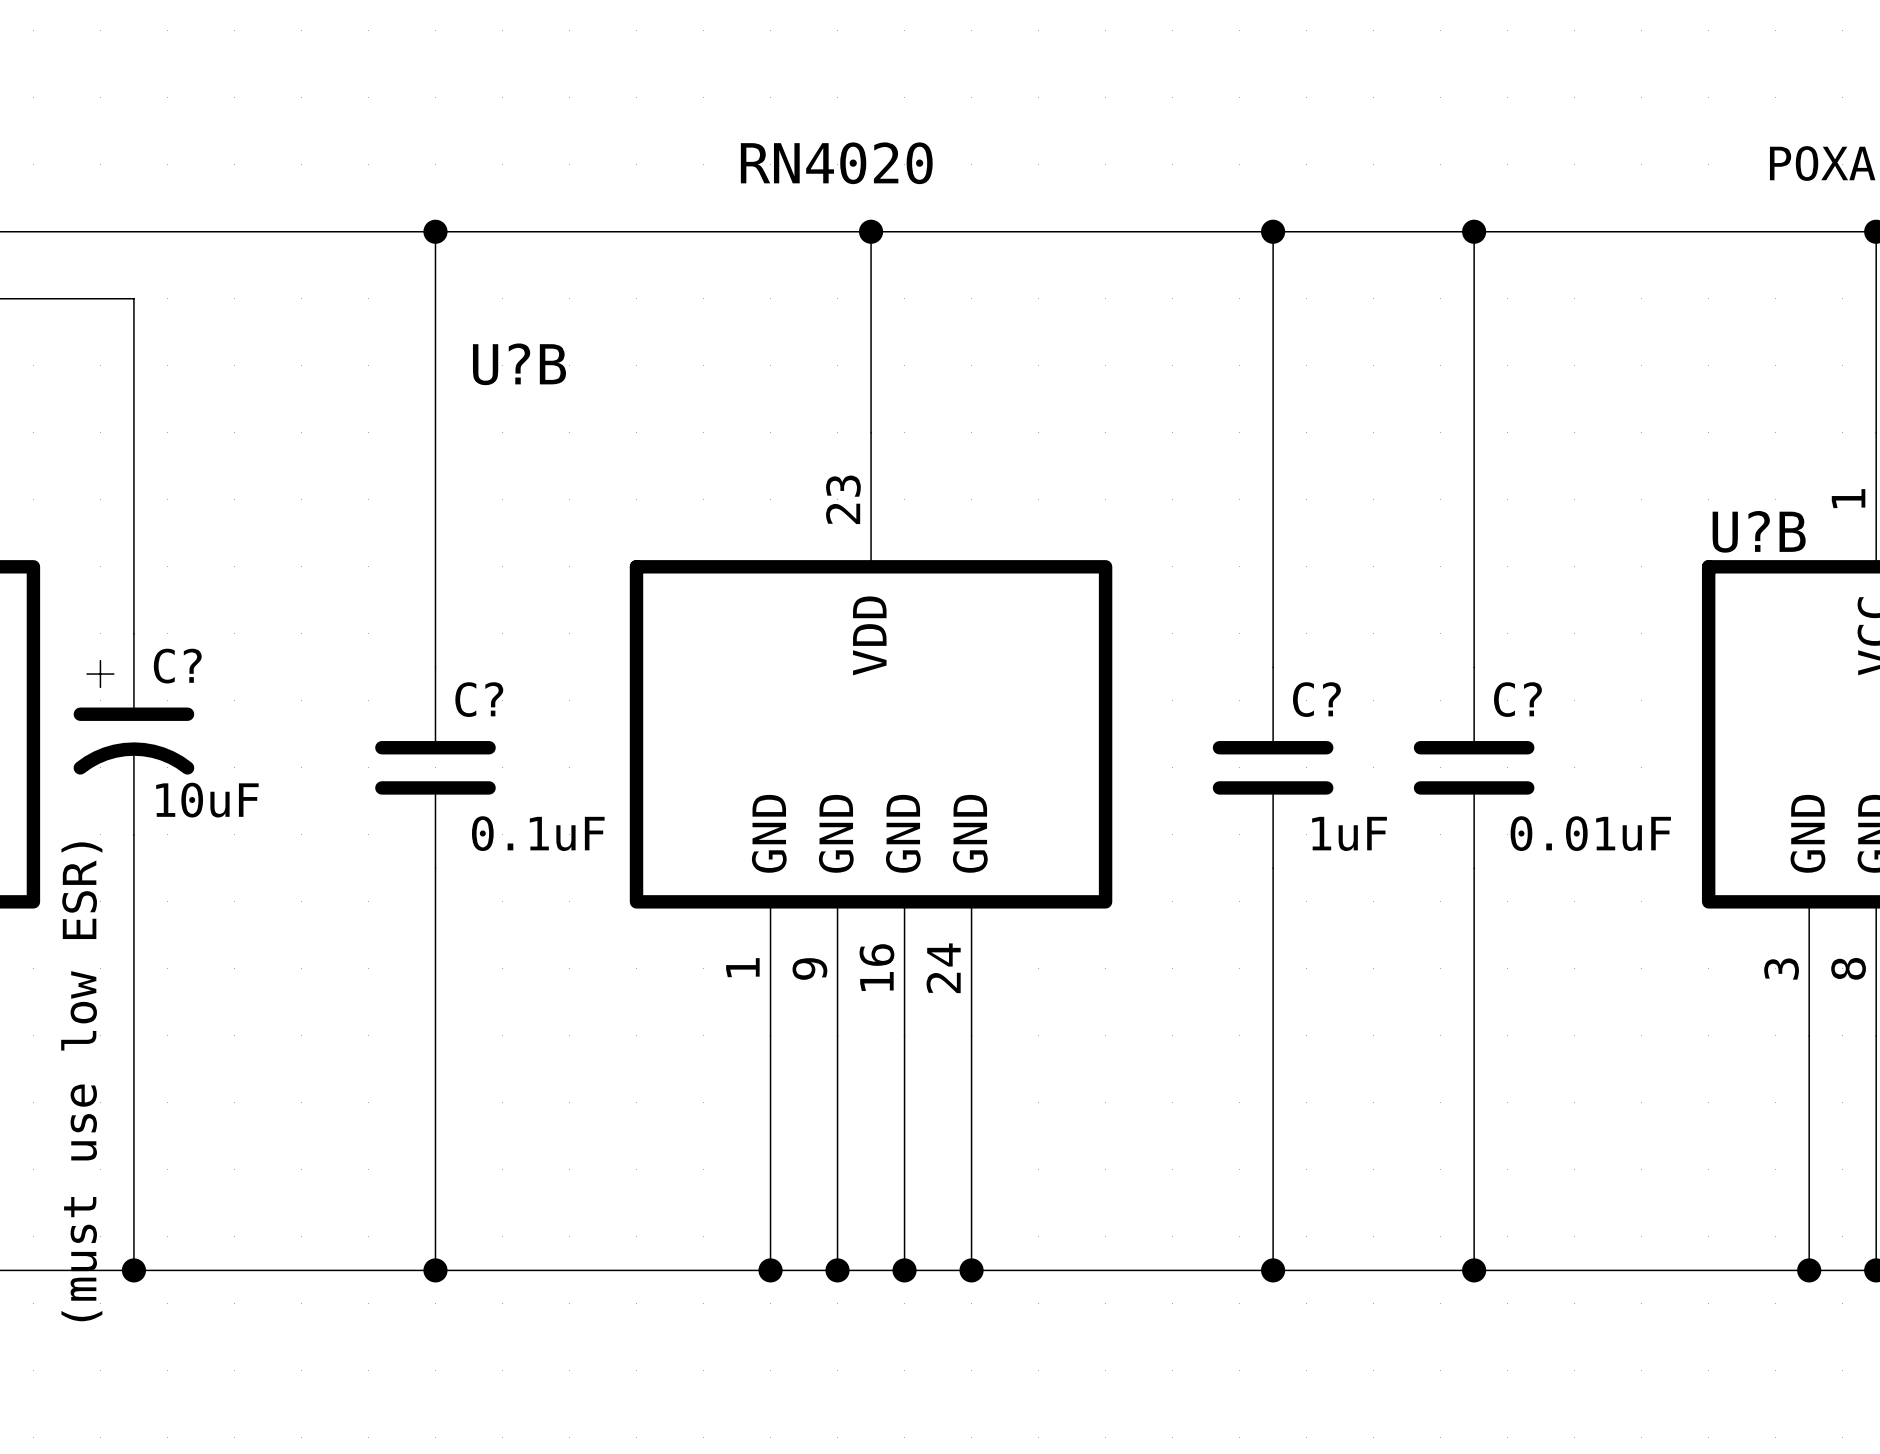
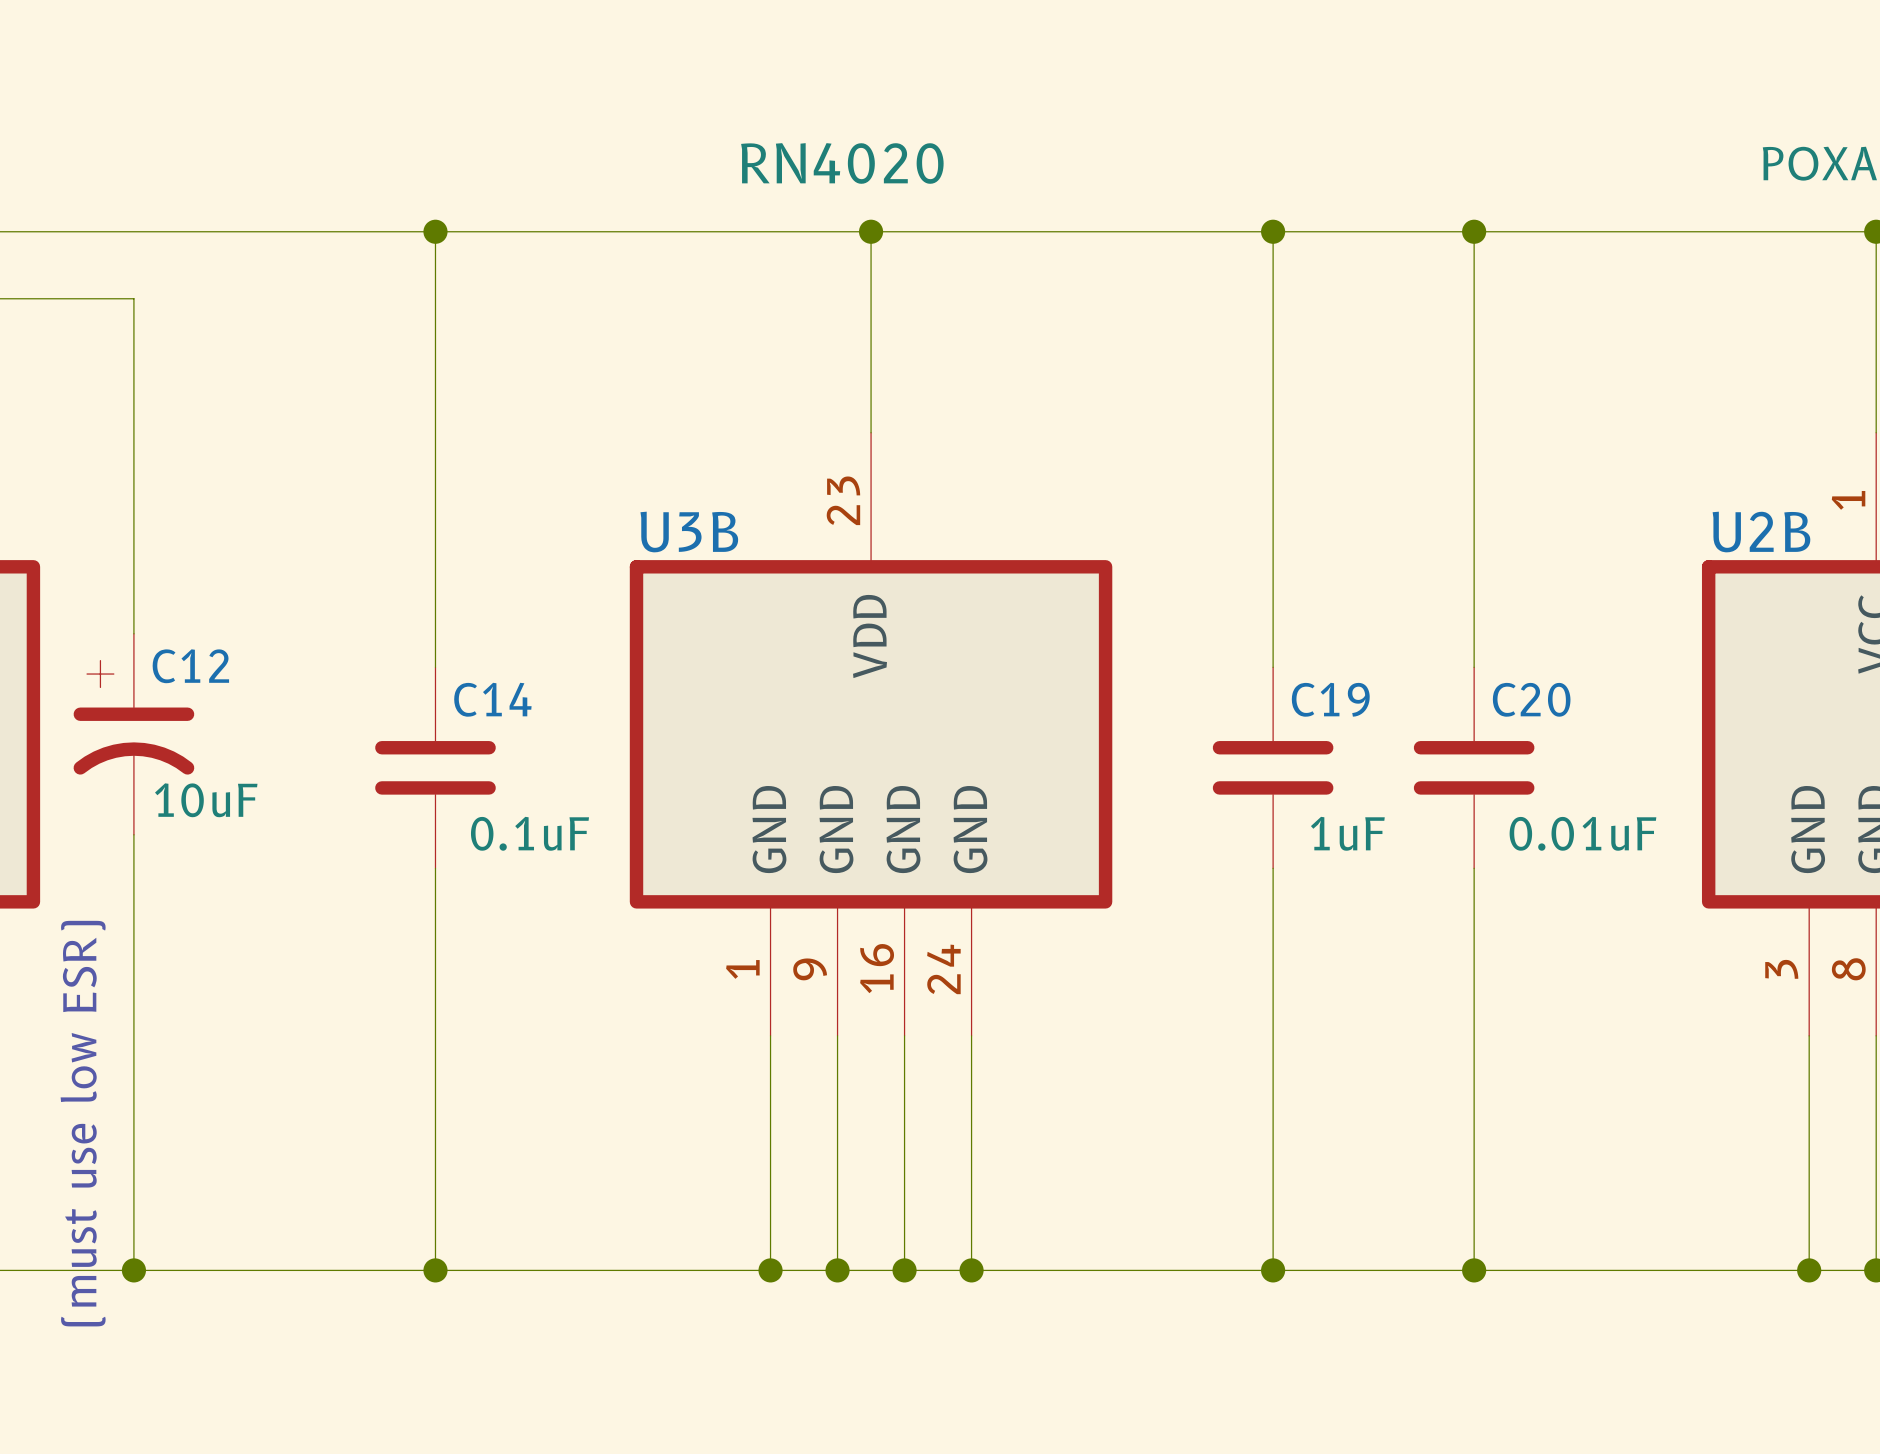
U?B name: U?B (519, 364) -> U3B (689, 532)
U?B name: U?B (1759, 531) -> U2B (1761, 532)
C? name: C? (177, 666) -> C12 (190, 666)
C? name: C? (479, 699) -> C14 (492, 699)
C? name: C? (1316, 699) -> C19 (1330, 699)
C? name: C? (1517, 699) -> C20 (1531, 699)

